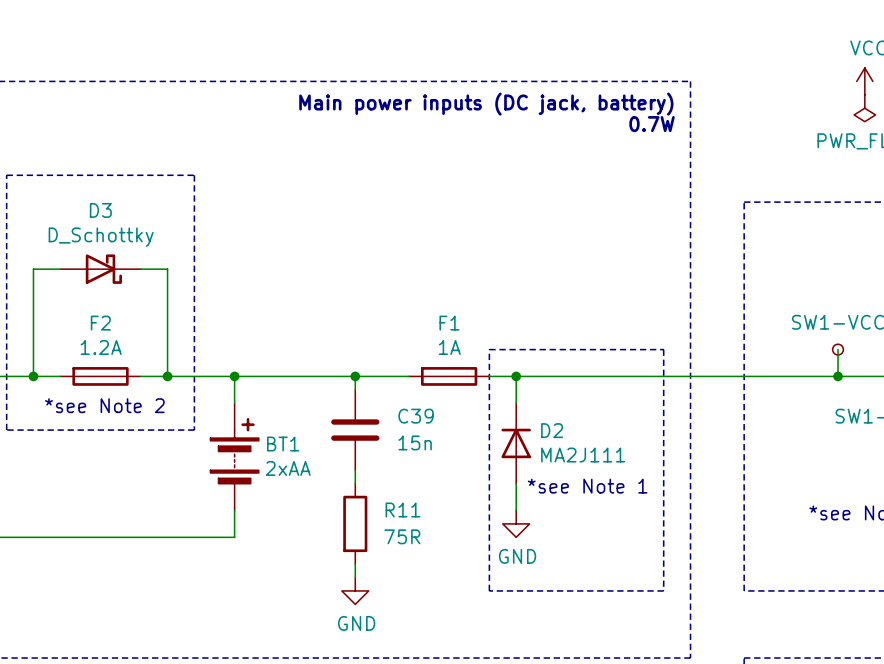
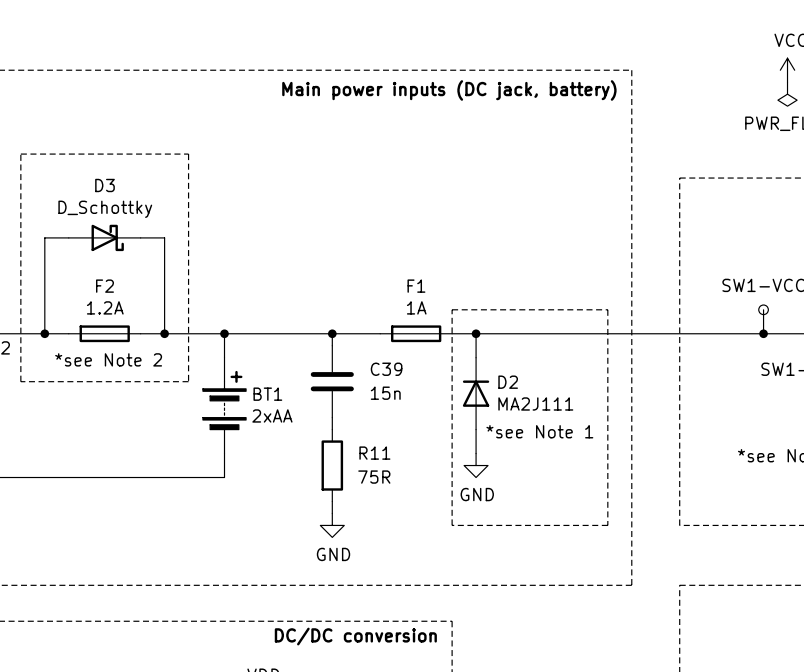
text: 0.7W (652, 124) -> none

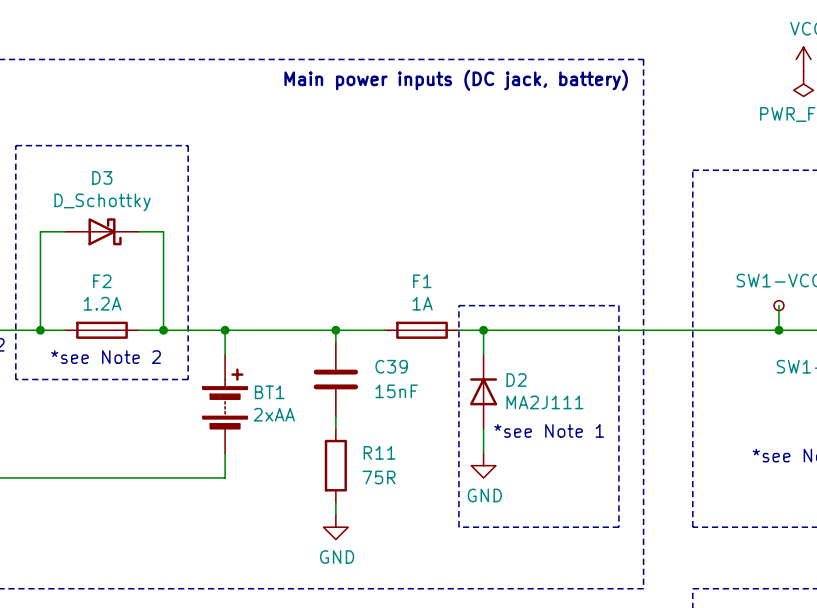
C39 value: 15n (385, 393) -> 15nF (396, 391)

